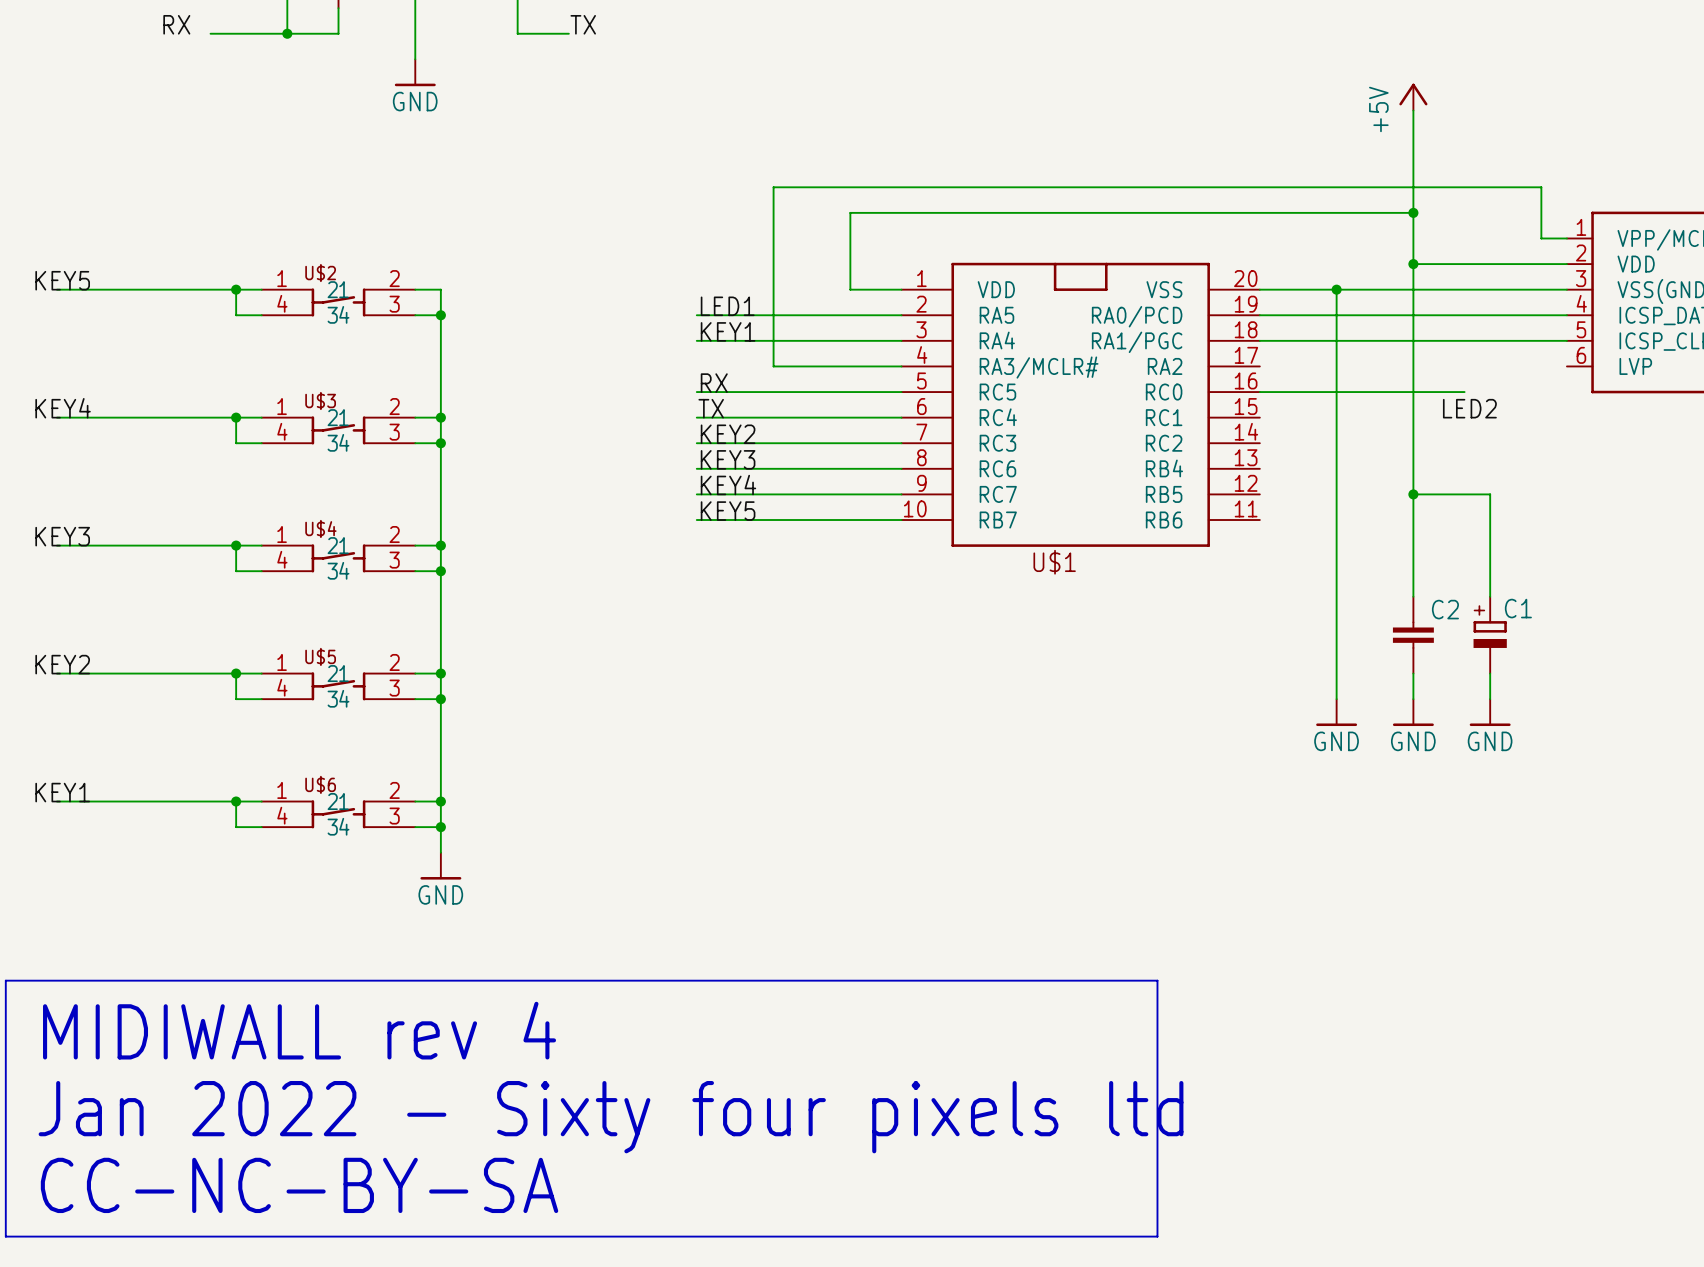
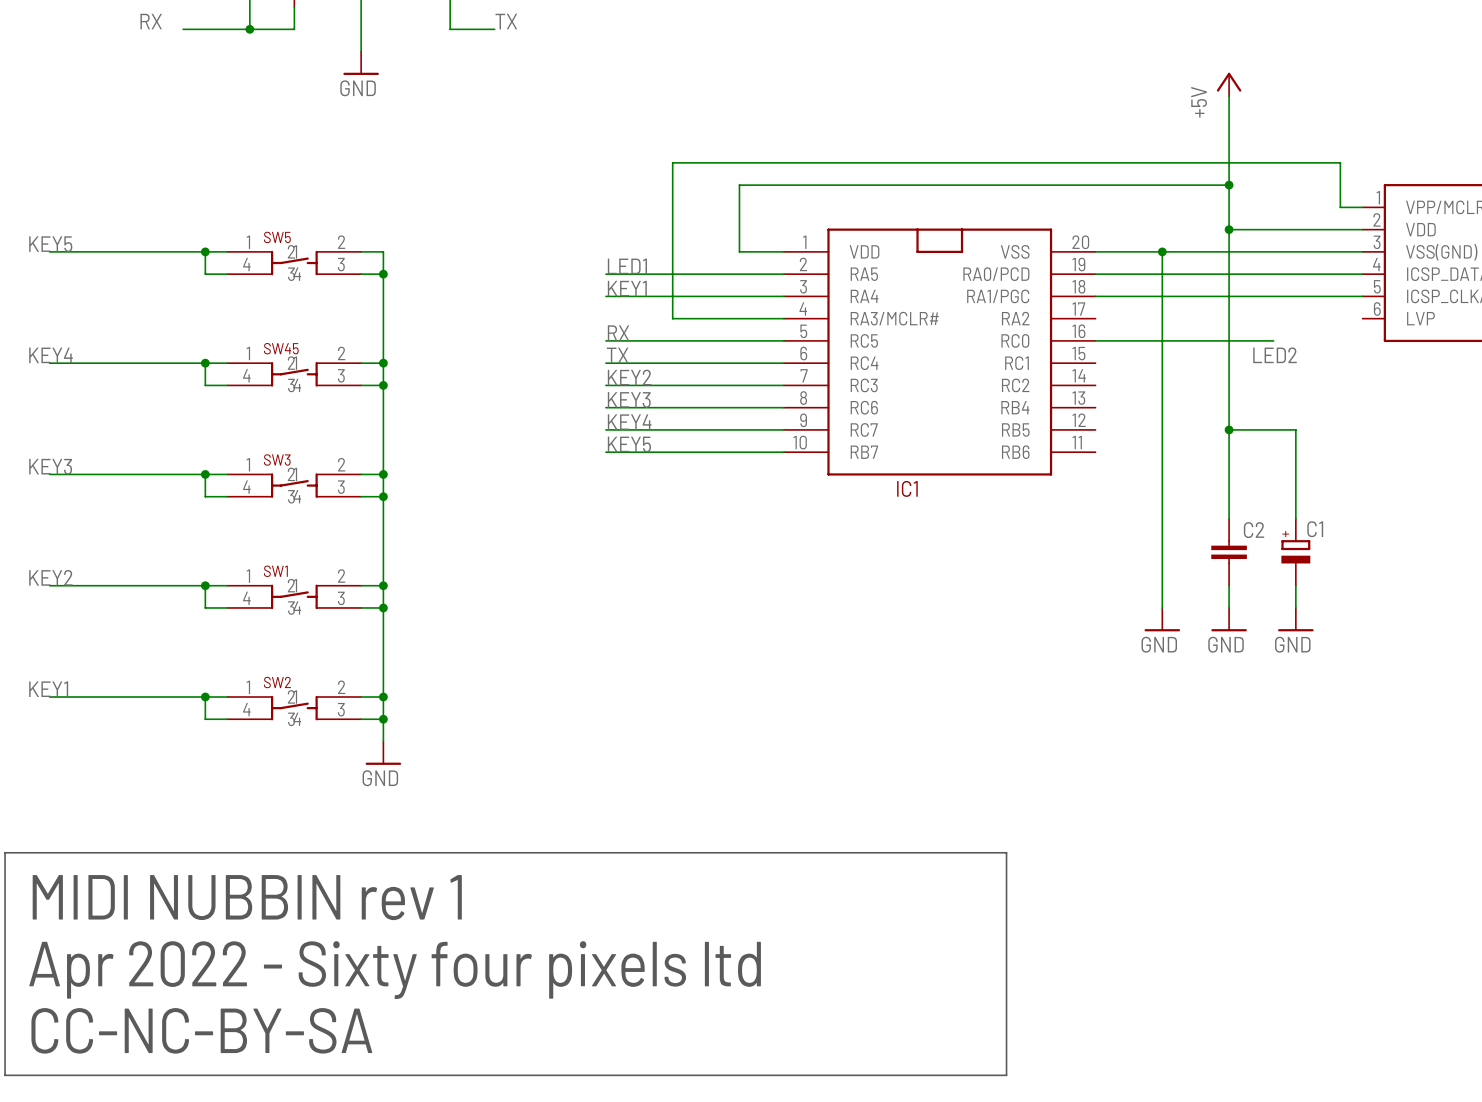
U$2 name: U$2 (320, 273) -> SW5 (277, 237)
U$3 name: U$3 (320, 401) -> SW45 (281, 348)
U$4 name: U$4 (320, 528) -> SW3 (277, 459)
U$1 name: U$1 (1054, 562) -> IC1 (907, 488)
U$5 name: U$5 (320, 656) -> SW1 (275, 571)
U$6 name: U$6 (320, 784) -> SW2 (277, 682)
text: MIDIWALL rev 4 (299, 1030) -> MIDI NUBBIN rev 1 (247, 897)
text: Jan 2022 - Sixty four pixels ltd (611, 1117) -> Apr 2022 - Sixty four pixels ltd (395, 970)

